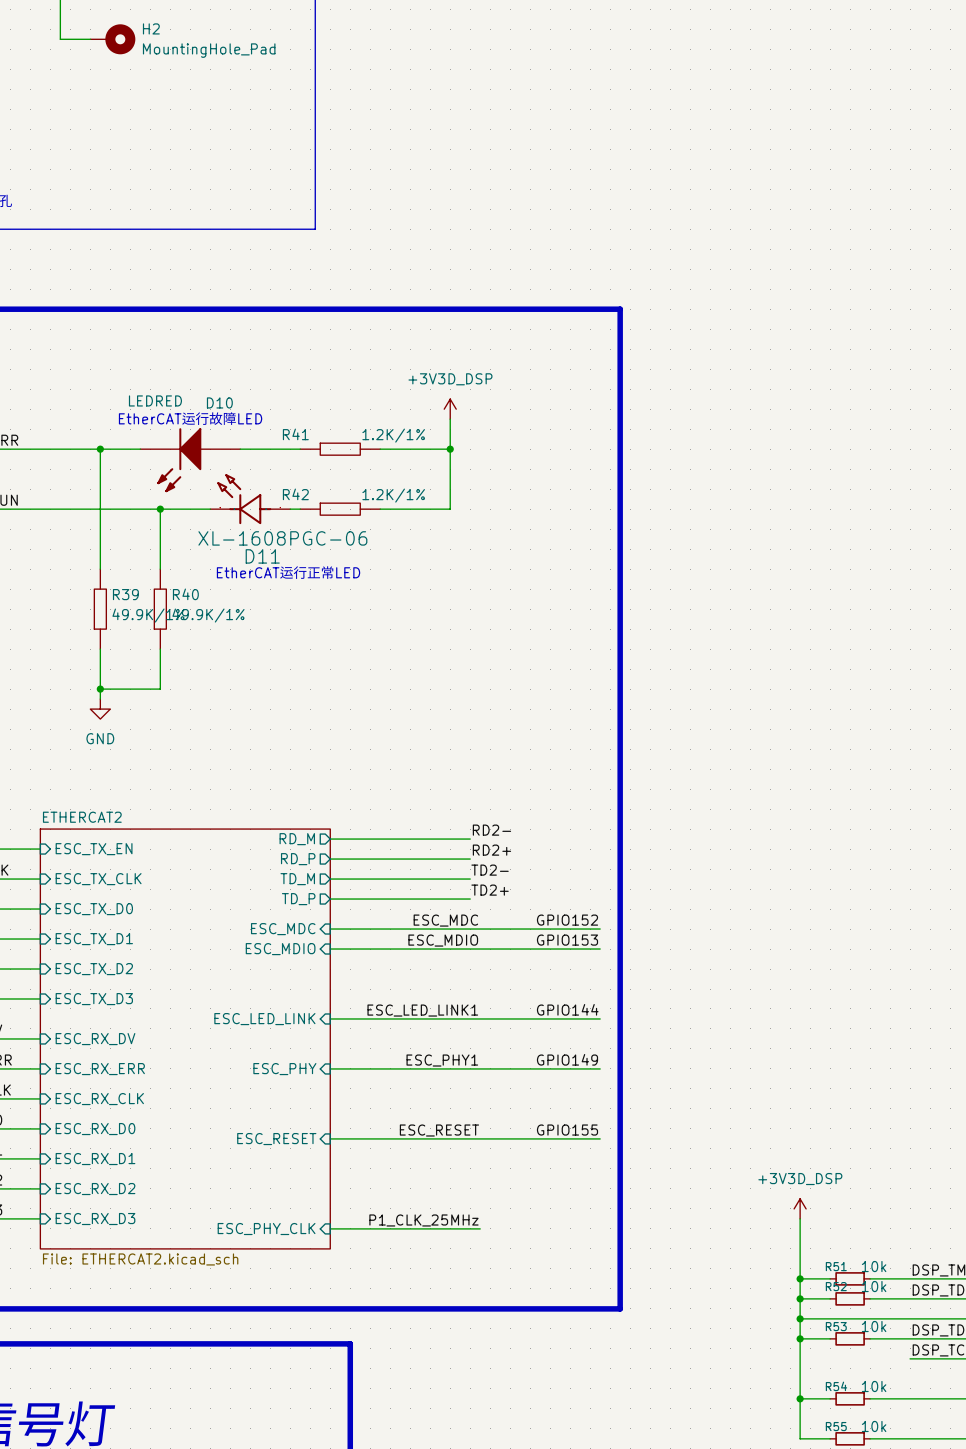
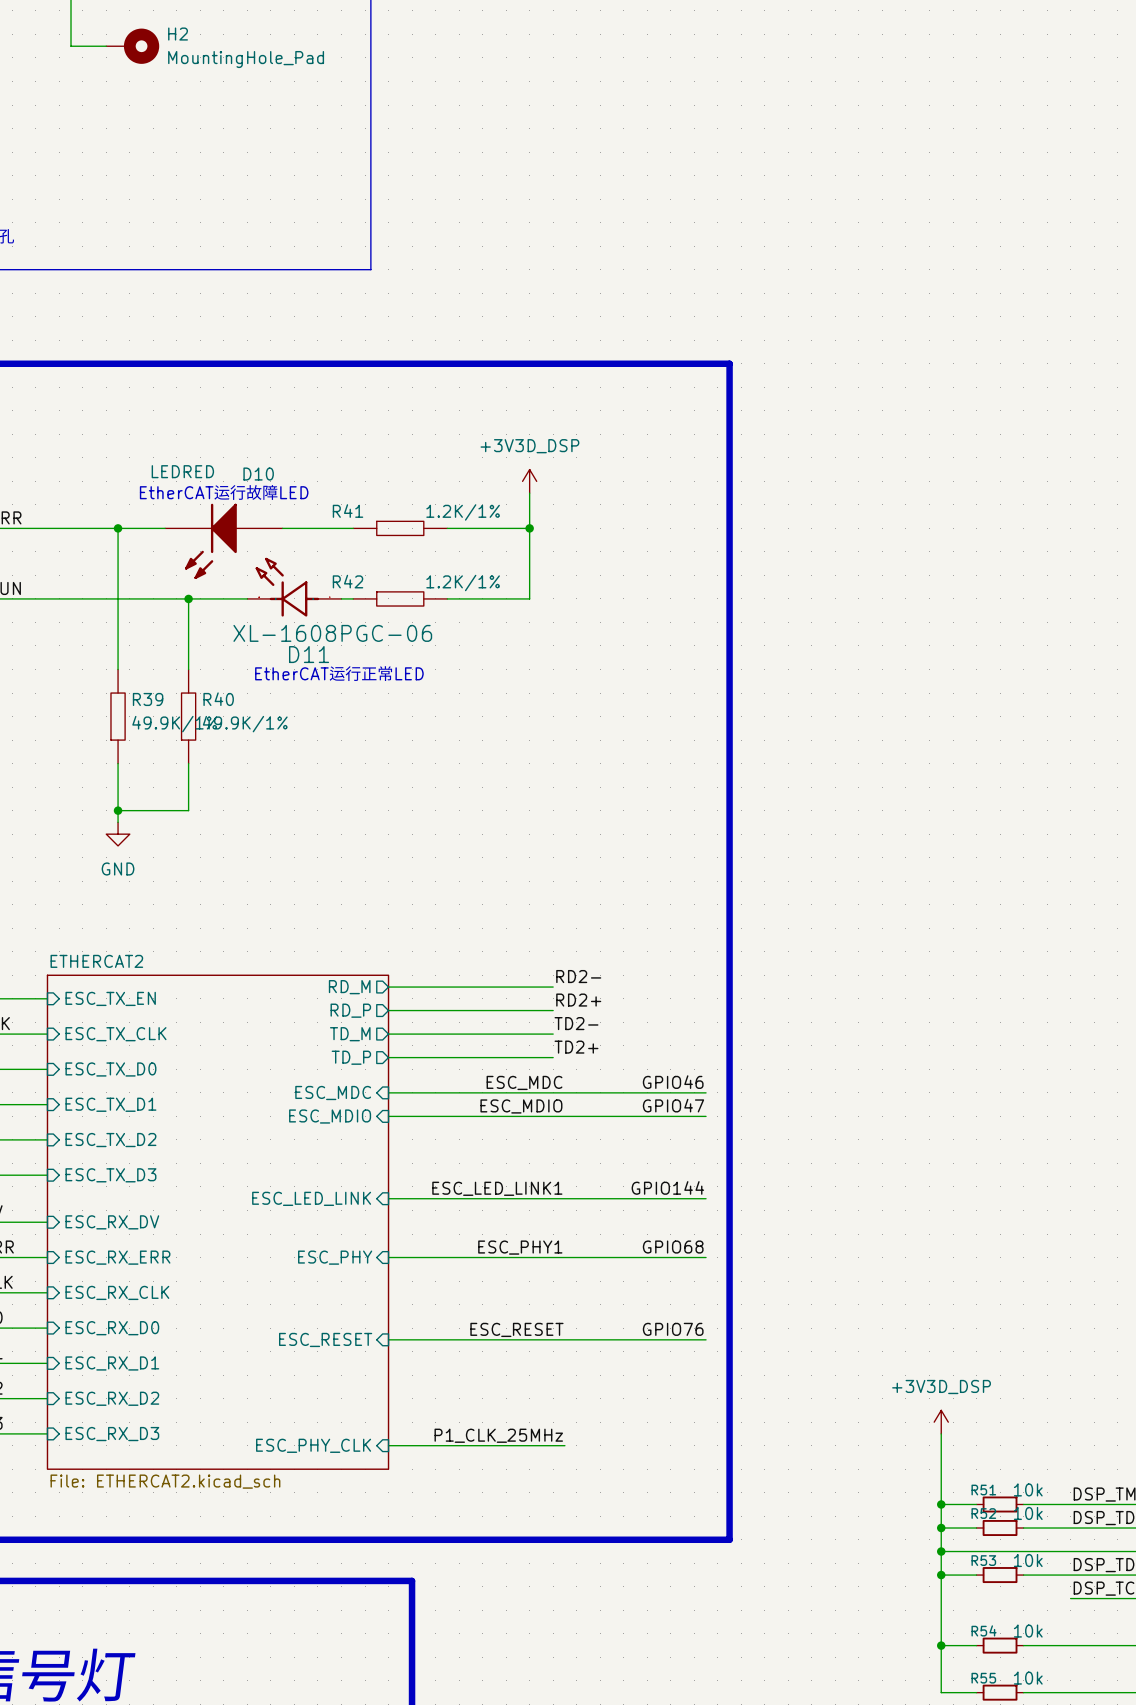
label: GPIO152 (567, 920) -> GPIO46 (673, 1082)
label: GPIO153 (567, 940) -> GPIO47 (673, 1105)
label: GPIO149 (567, 1059) -> GPIO68 (673, 1247)
label: GPIO155 (567, 1130) -> GPIO76 (673, 1329)

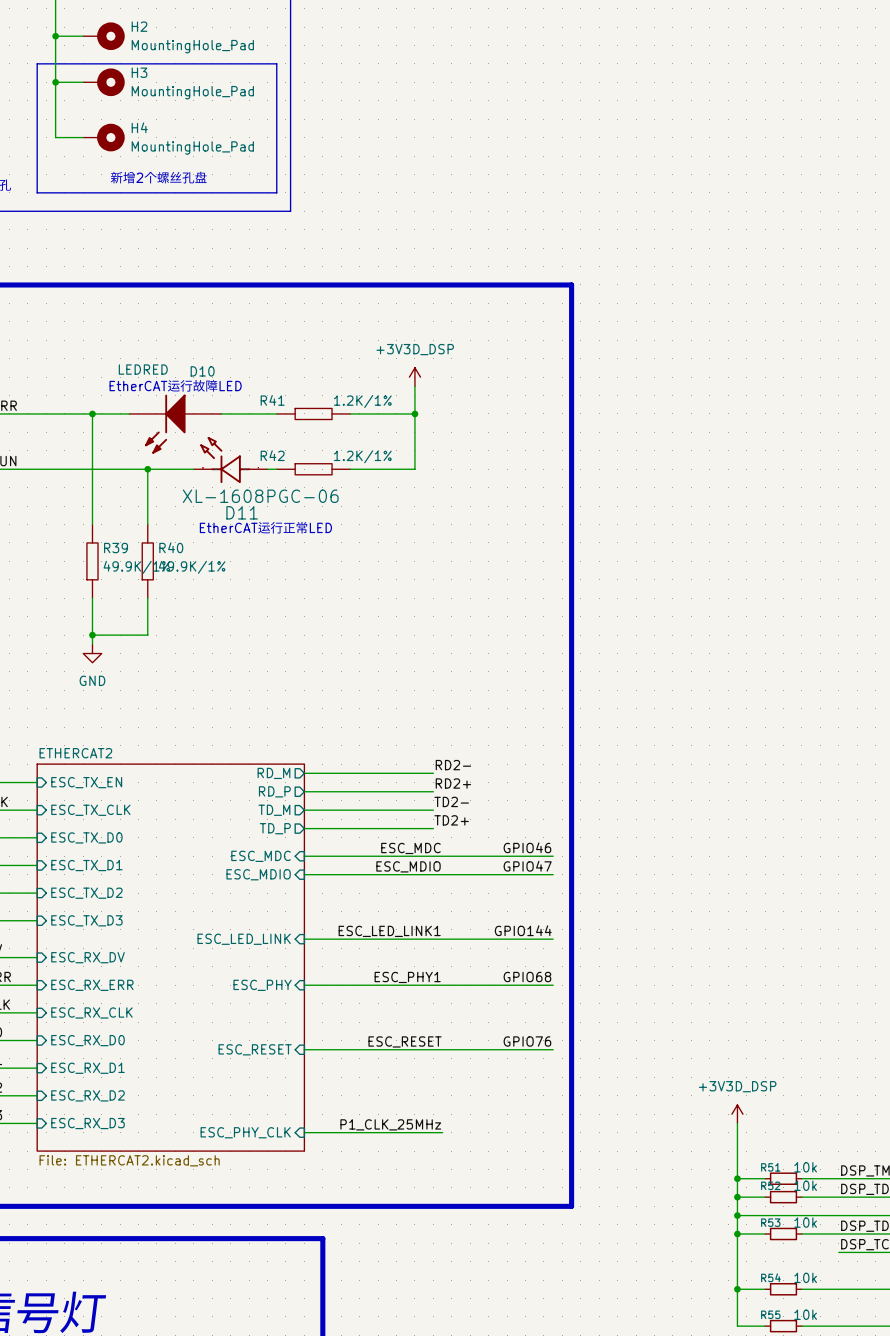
wire: none -> (55, 36) (55, 137) (83, 137)
junction: none -> (55, 36)
line: none -> (37, 63) (276, 63) (276, 192) (37, 192) (37, 63)
wire: none -> (55, 82) (83, 82)
junction: none -> (55, 82)
H3: none -> MountingHole_Pad (104, 82)
H4: none -> MountingHole_Pad (104, 137)
text: none -> 新增2个螺丝孔盘 (158, 177)

